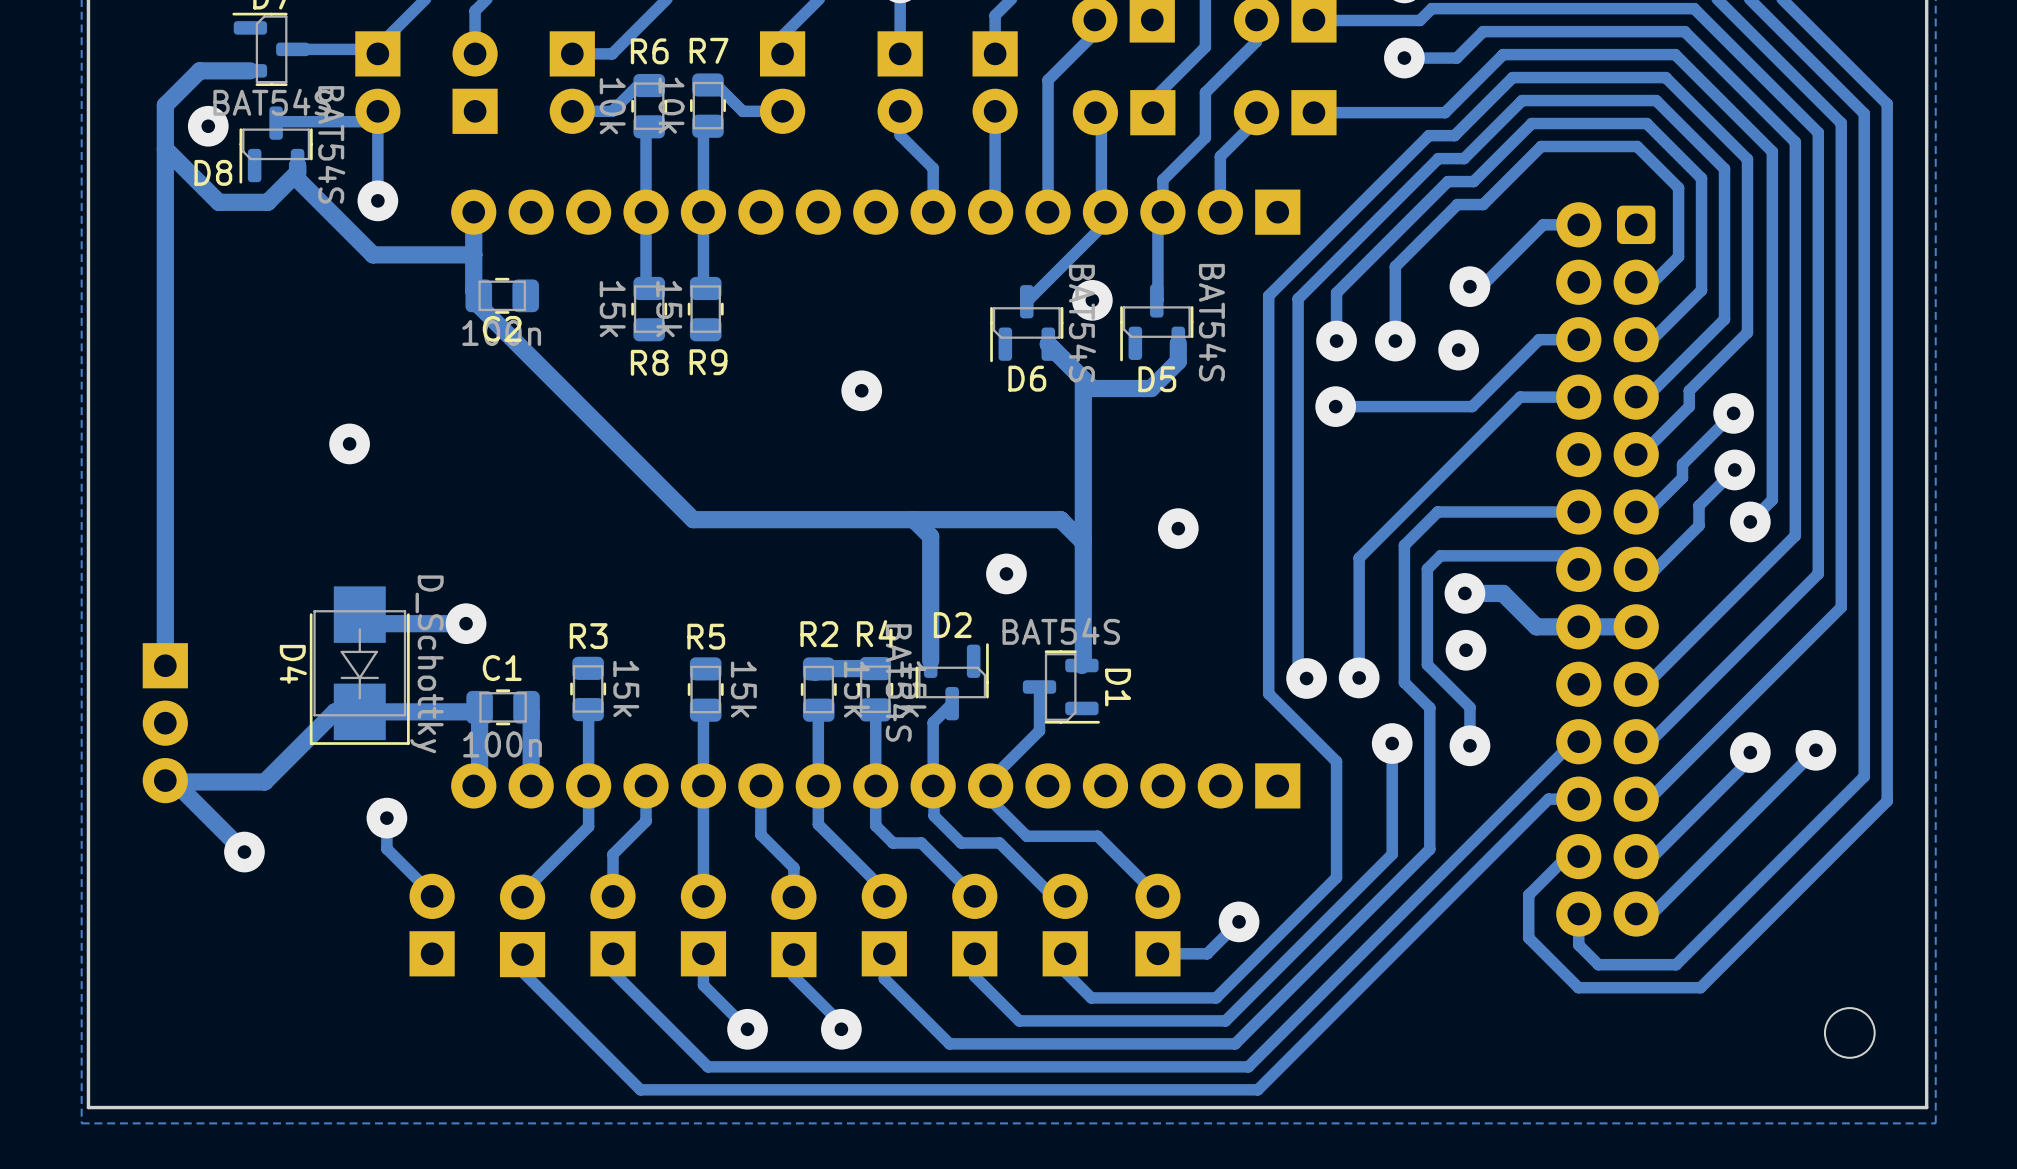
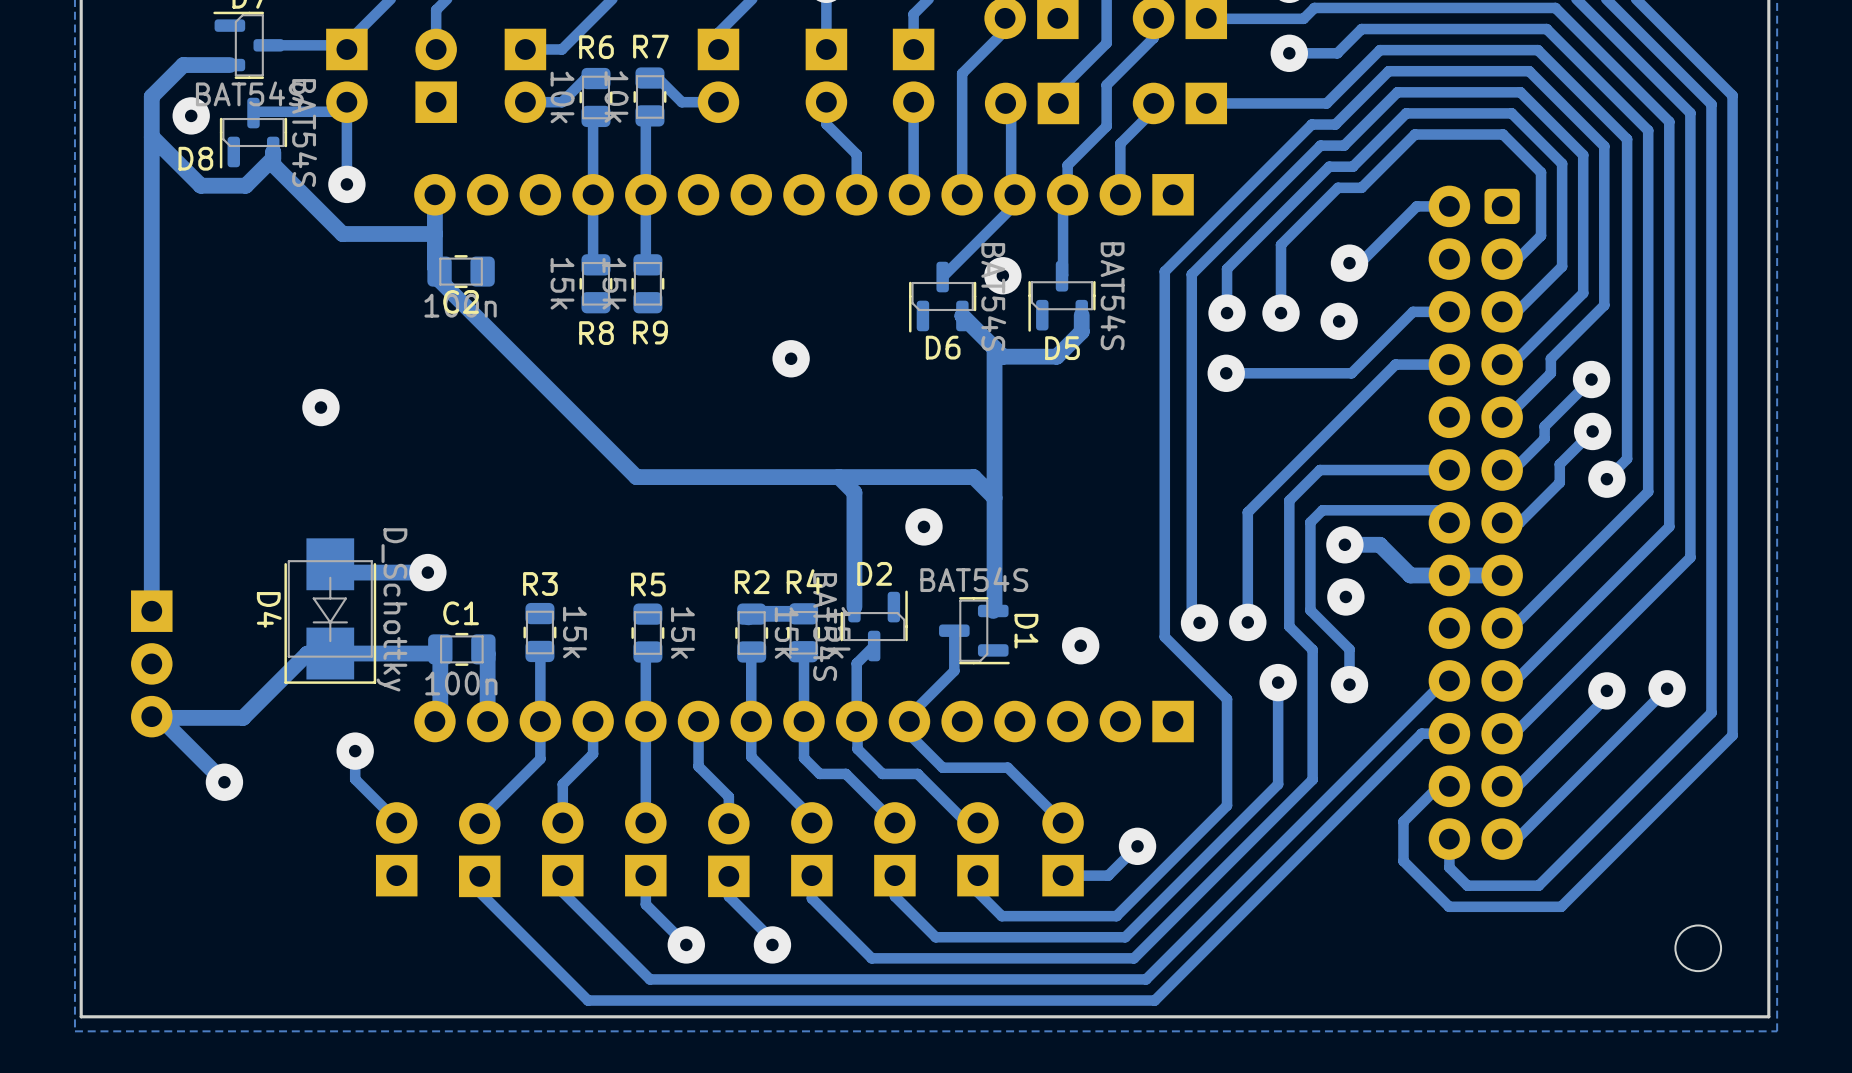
via: (1178, 528) -> none
via: none -> (1080, 645)

